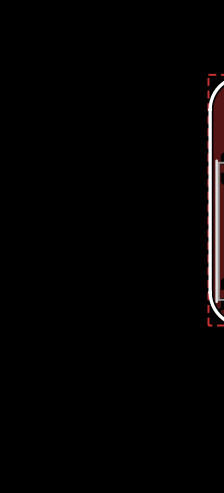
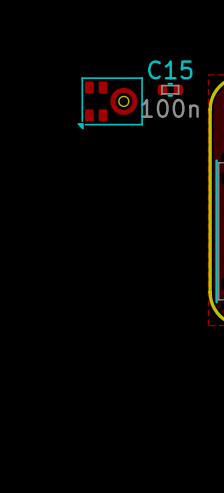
C15: none -> 100n (170, 89)
part: none -> (110, 103)

